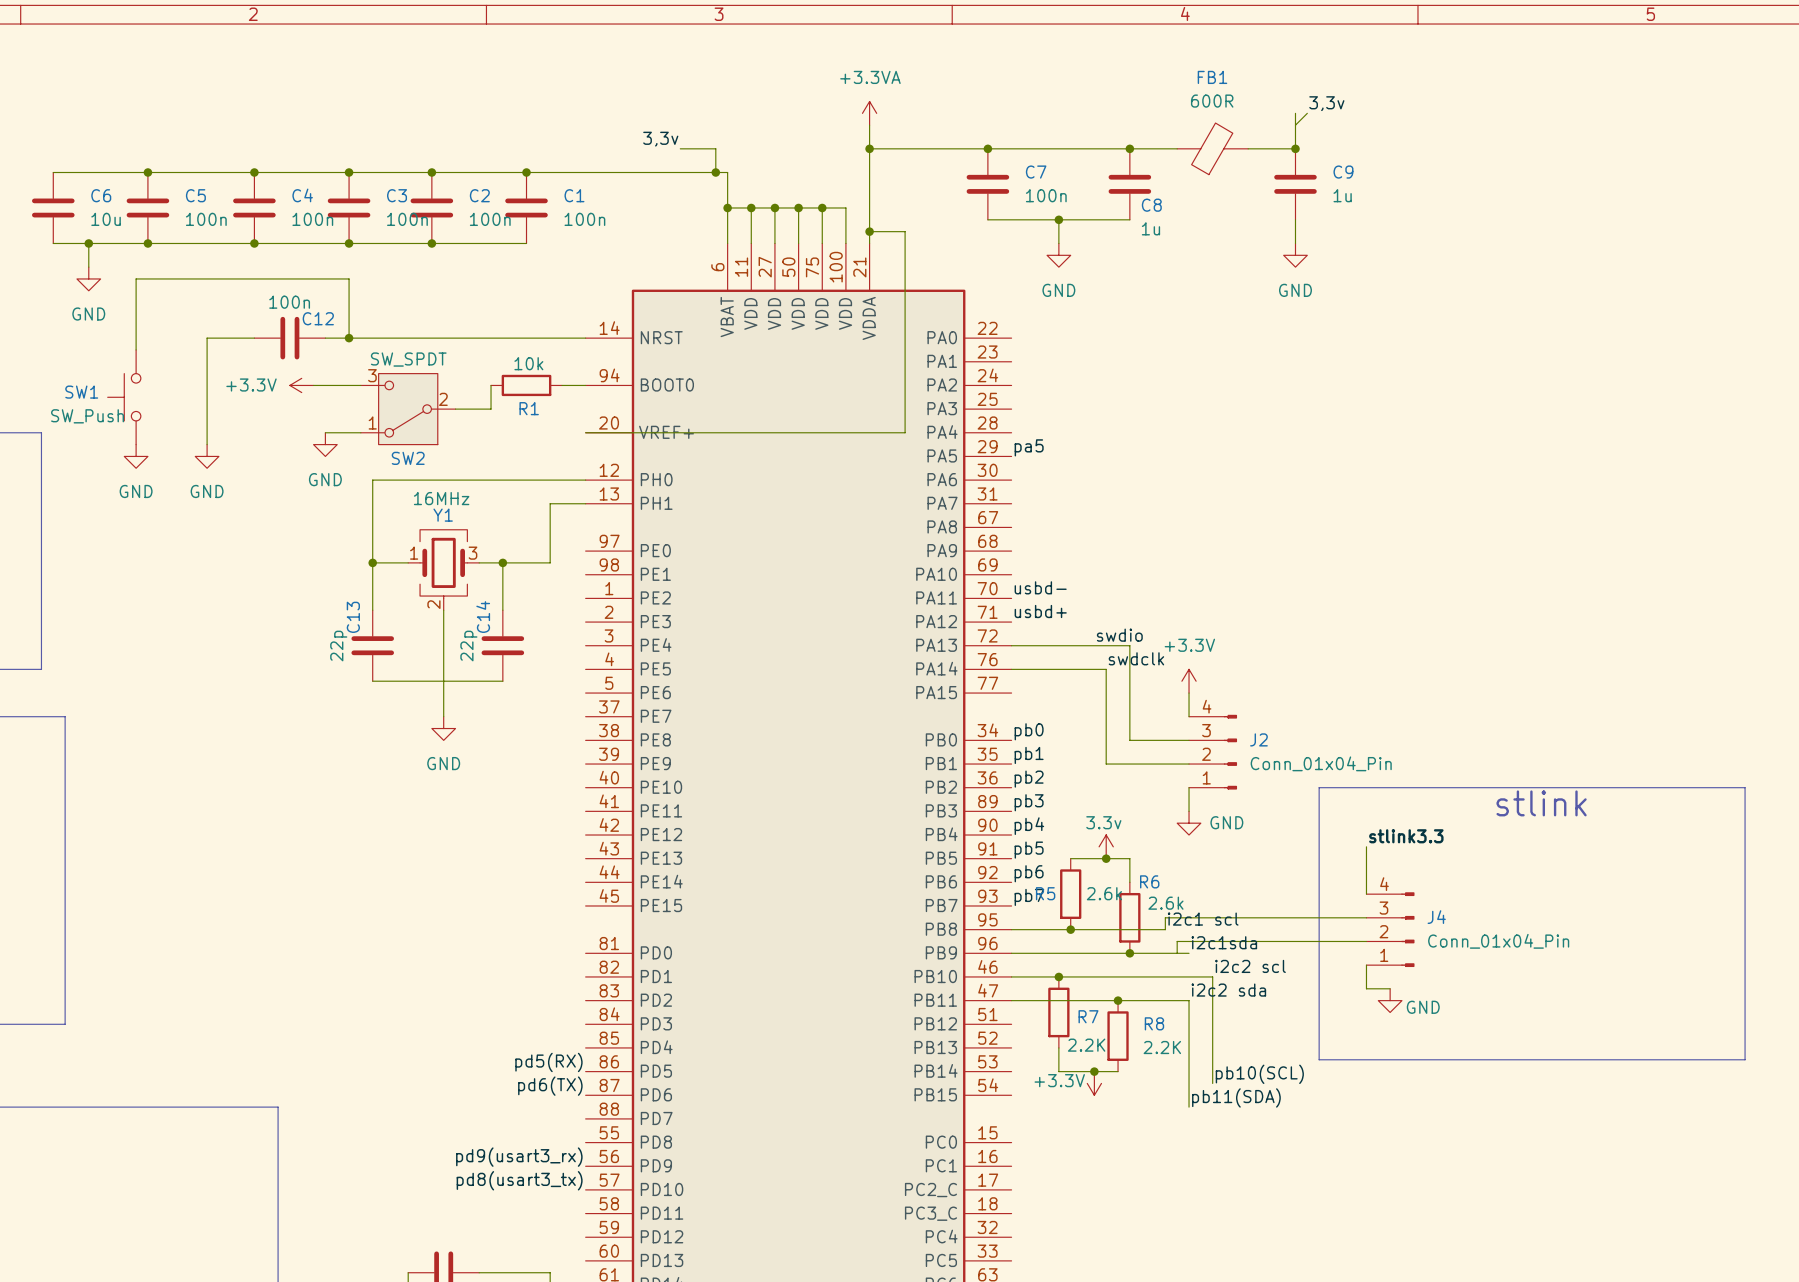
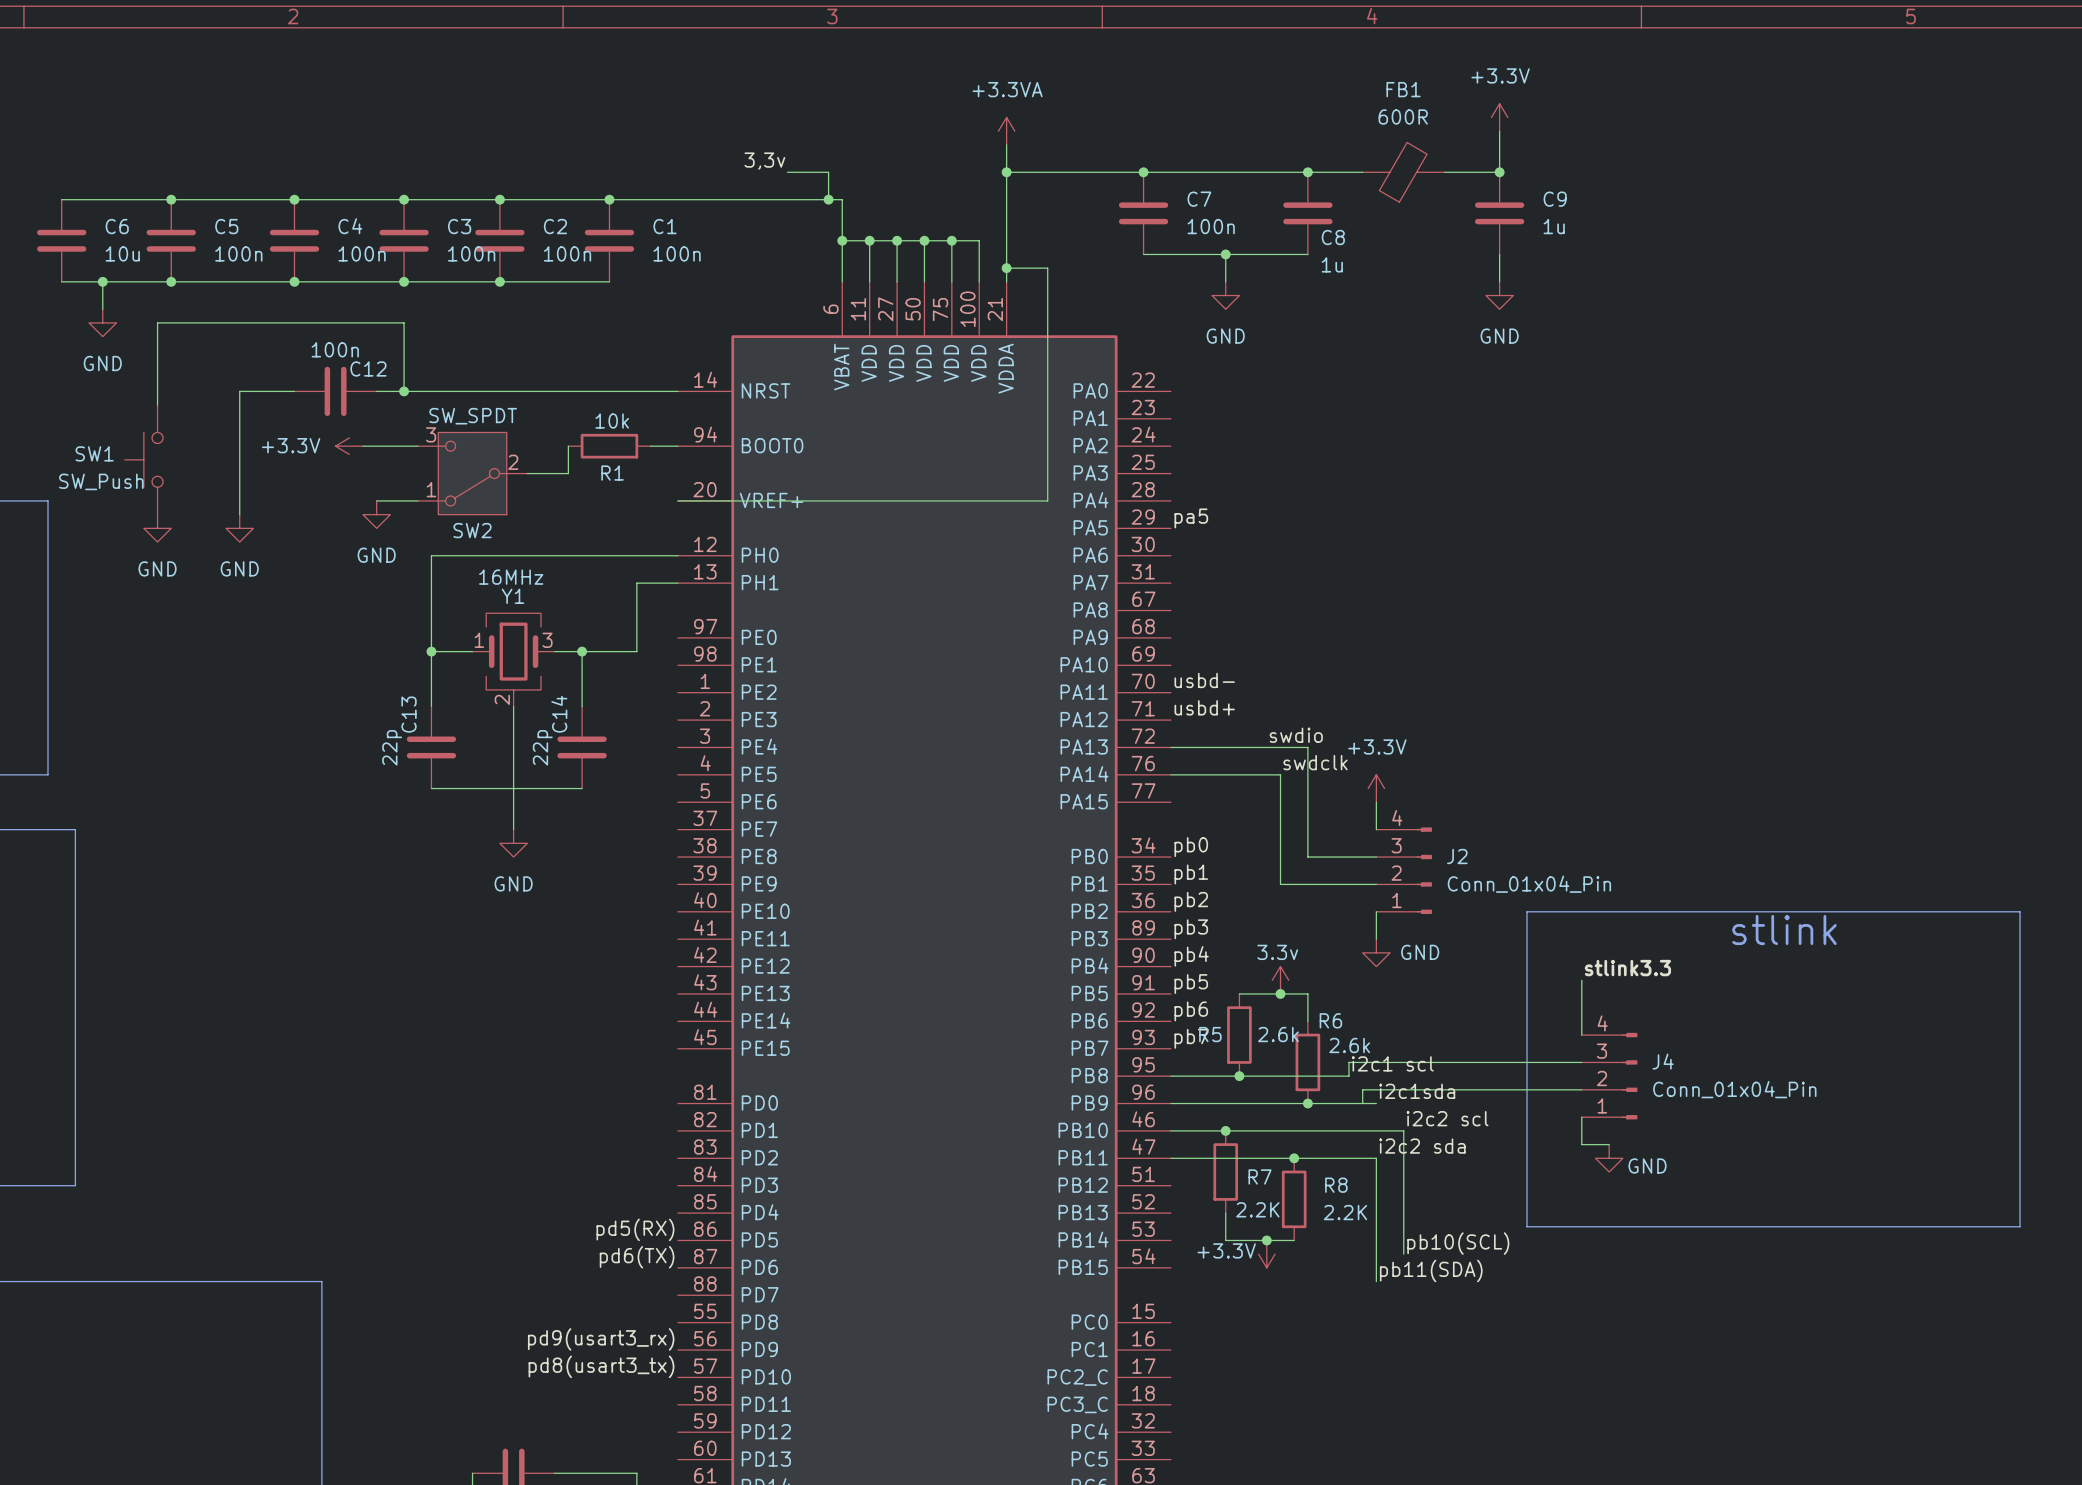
power symbol: none -> +3.3V (1499, 117)
label: 3,3v (1326, 103) -> none
wire: (1307, 113) (1295, 125) -> none

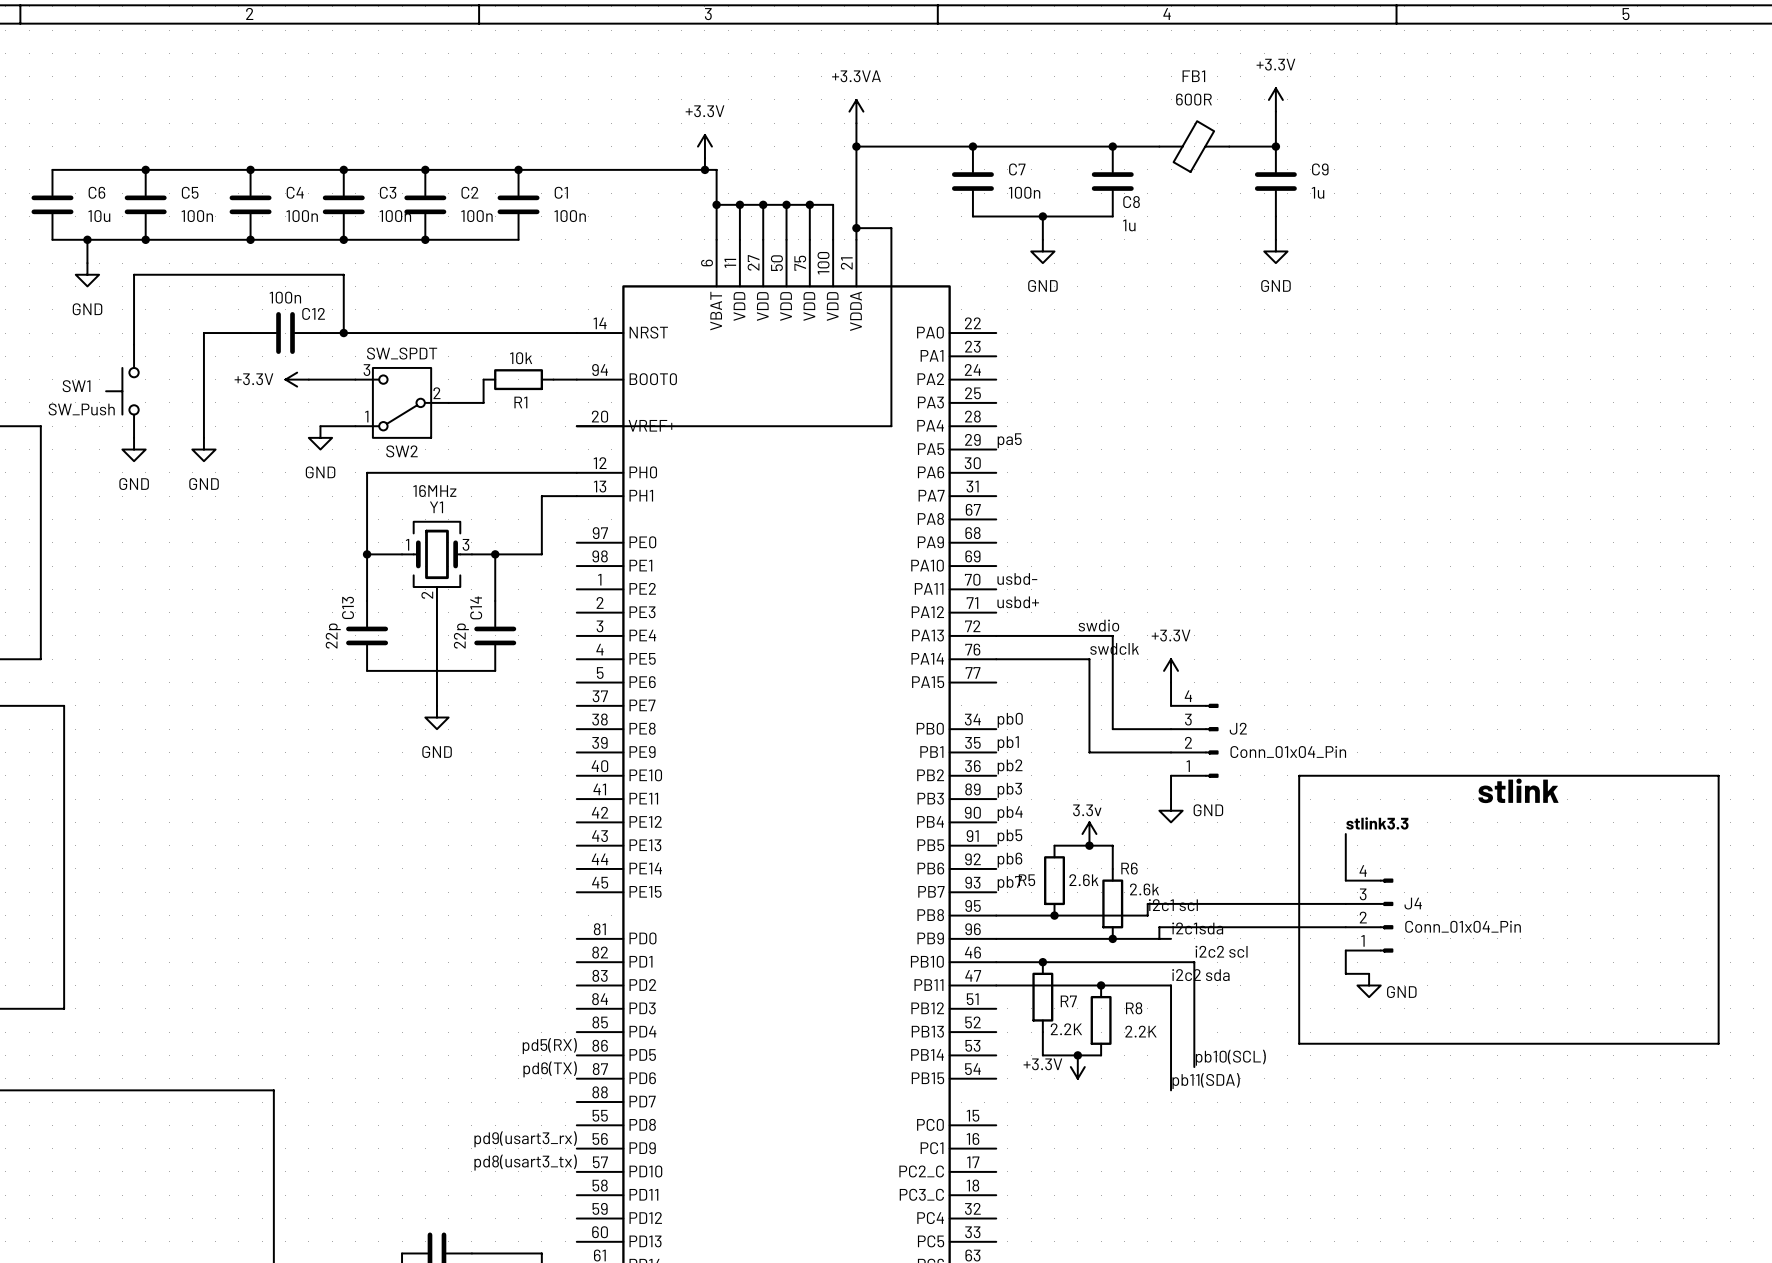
label: 3,3v (764, 161) -> none
wire: (787, 172) (828, 172) (828, 185) -> none
power symbol: none -> +3.3V (704, 146)

